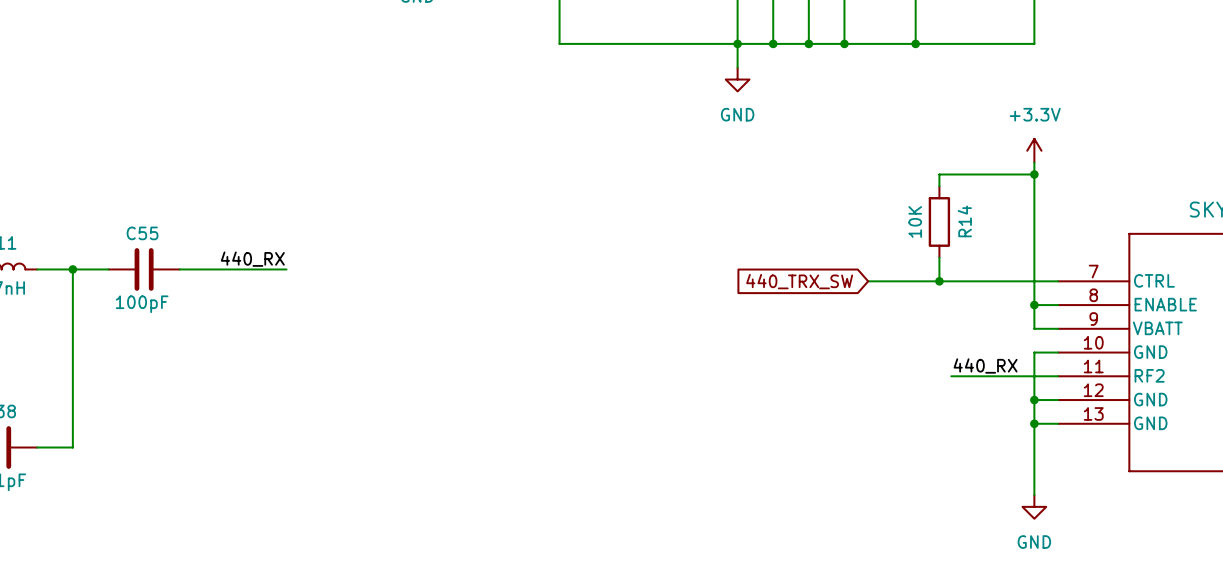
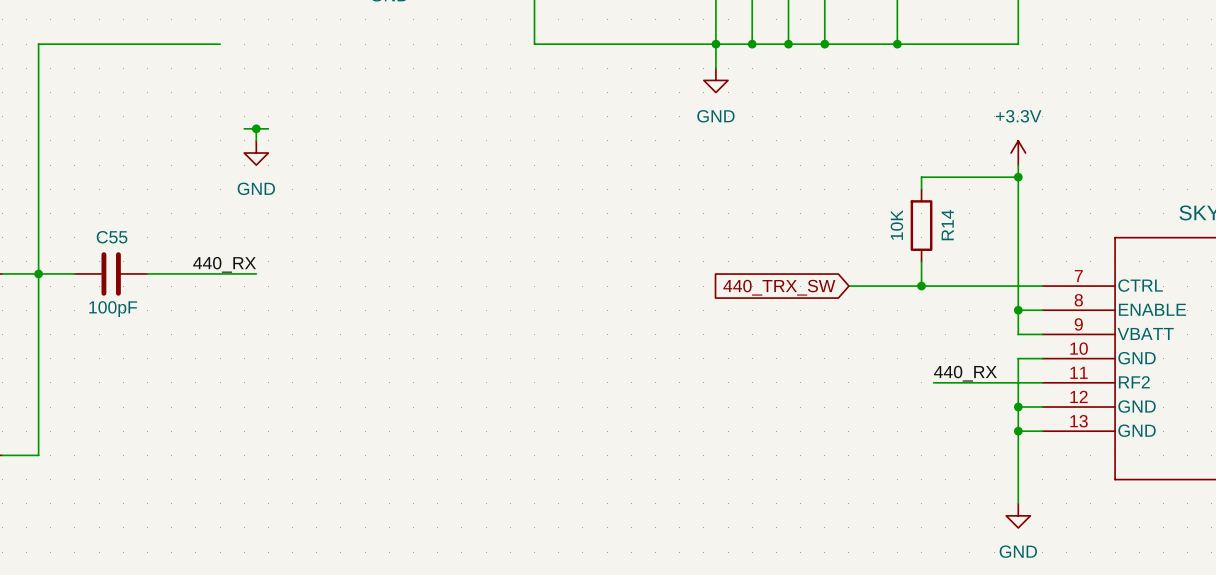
wire: none -> (220, 44) (38, 44) (38, 273)
wire: none -> (244, 128) (268, 128)
wire: none -> (256, 128) (256, 140)
junction: none -> (256, 128)
power symbol: none -> GND (256, 153)

